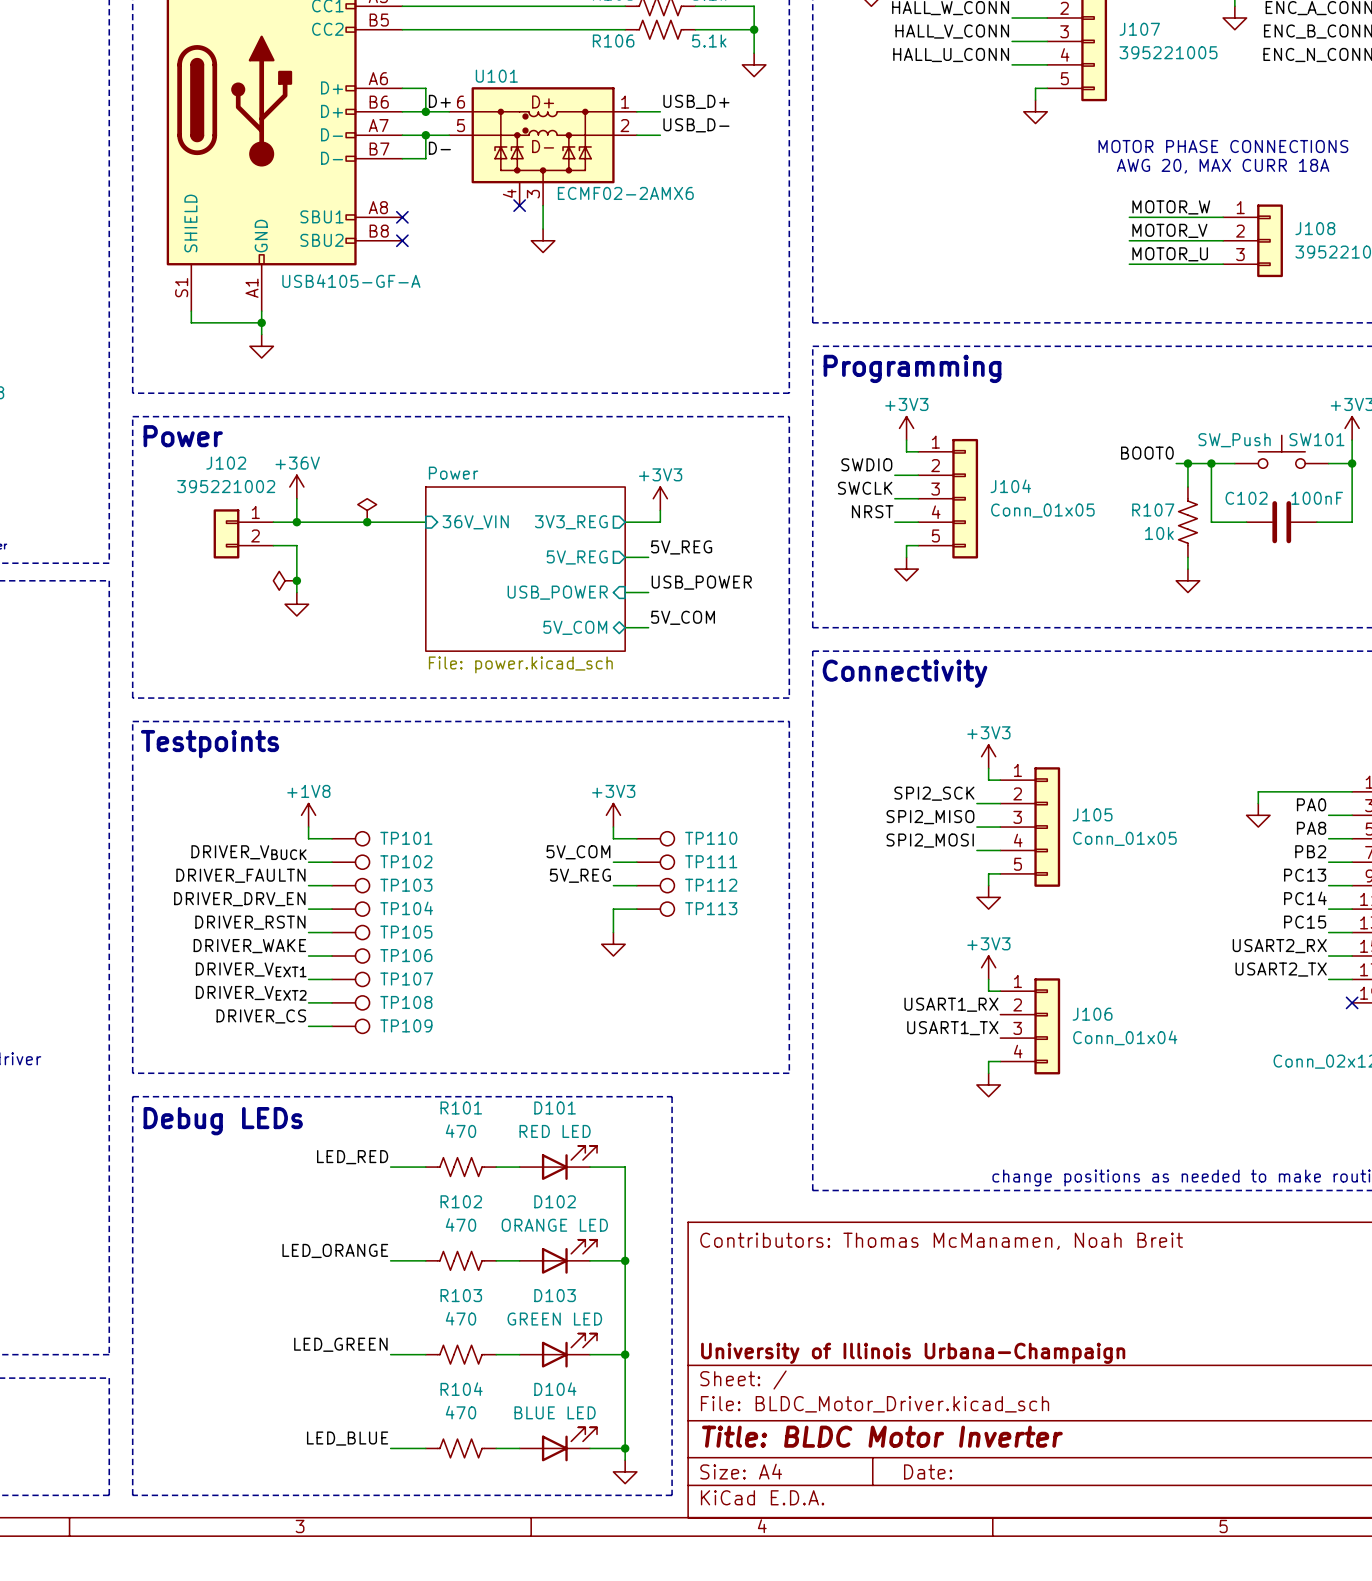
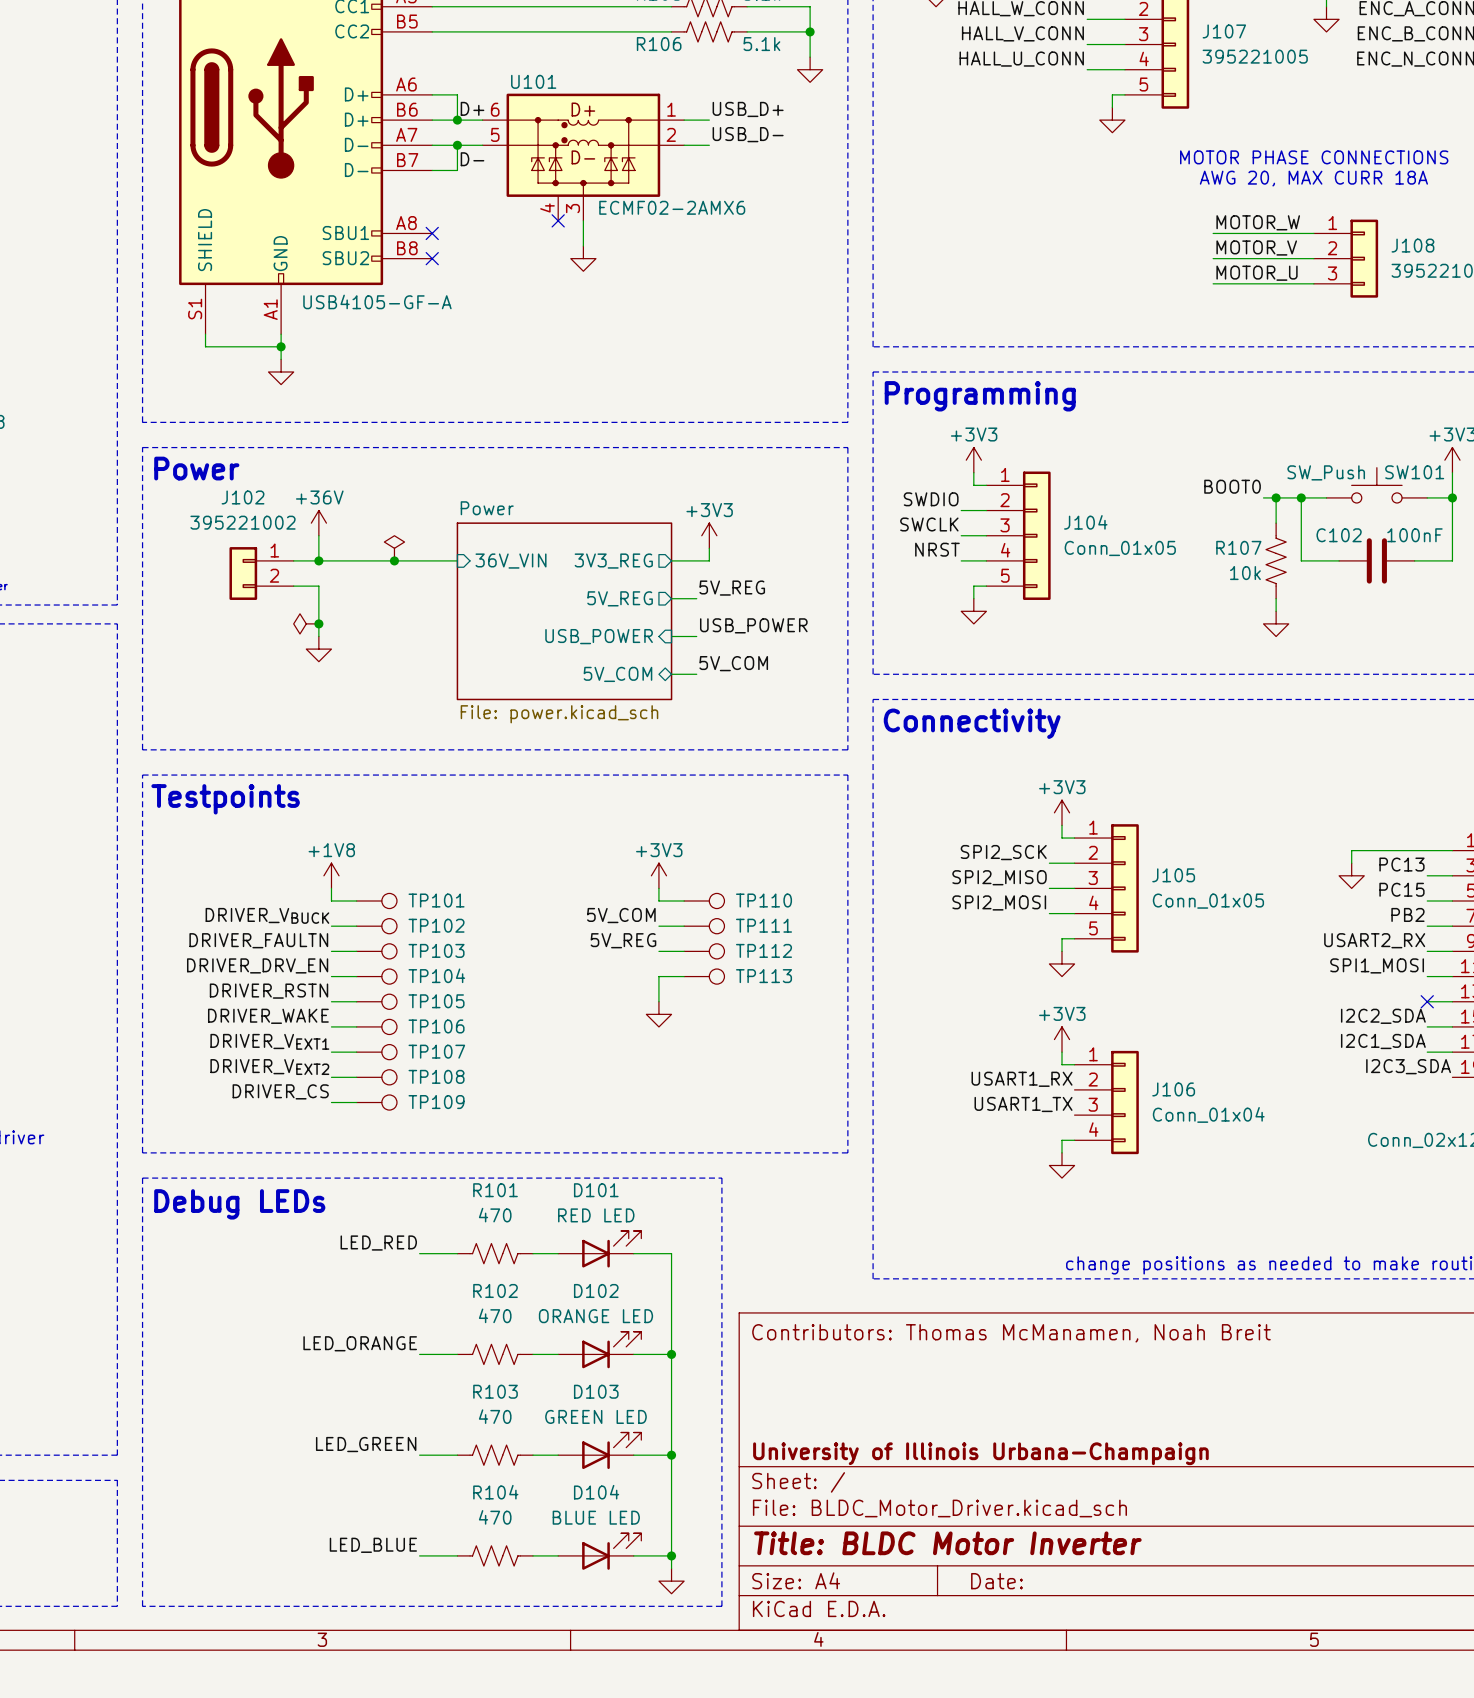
label: PA0 (1311, 804) -> PC13 (1401, 864)
label: PA8 (1311, 828) -> PC15 (1401, 889)
label: PC13 (1305, 875) -> USART2_RX (1374, 940)
label: PC14 (1305, 898) -> SPI1_MOSI (1377, 965)
label: PC15 (1305, 922) -> none
no-connect mark: none -> (1427, 1001)
label: USART2_RX (1279, 946) -> I2C2_SDA (1383, 1016)
label: USART2_TX (1281, 969) -> I2C1_SDA (1383, 1041)
label: none -> I2C3_SDA (1408, 1066)
no-connect mark: (1352, 1002) -> none

